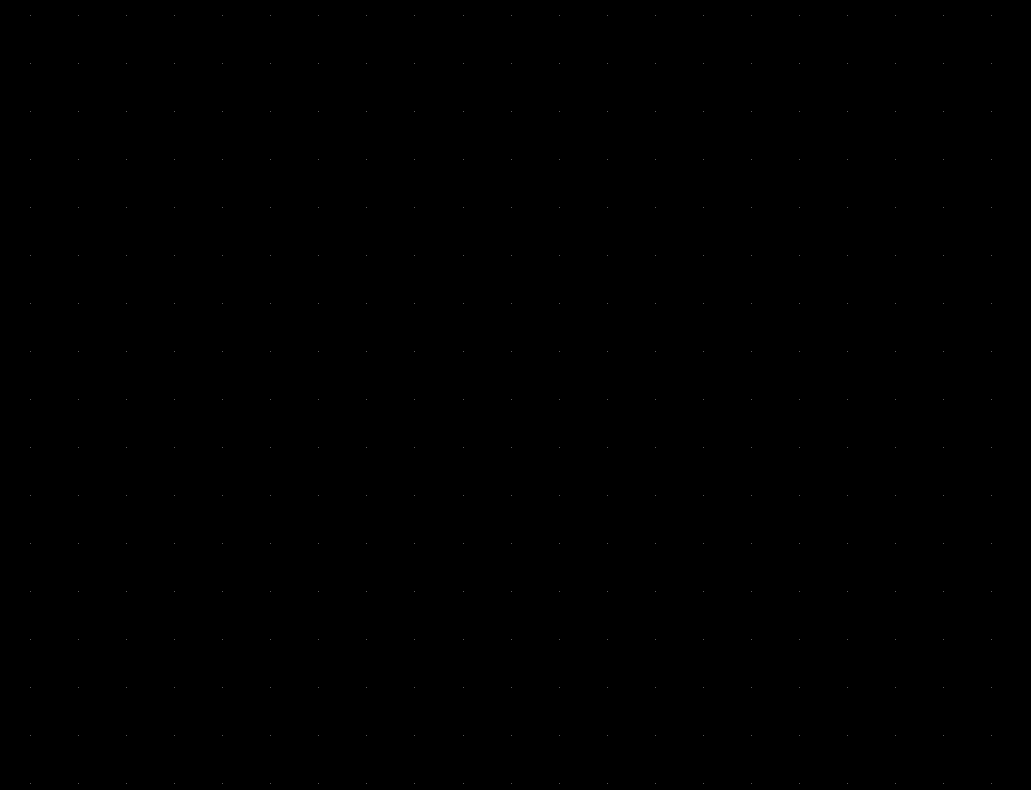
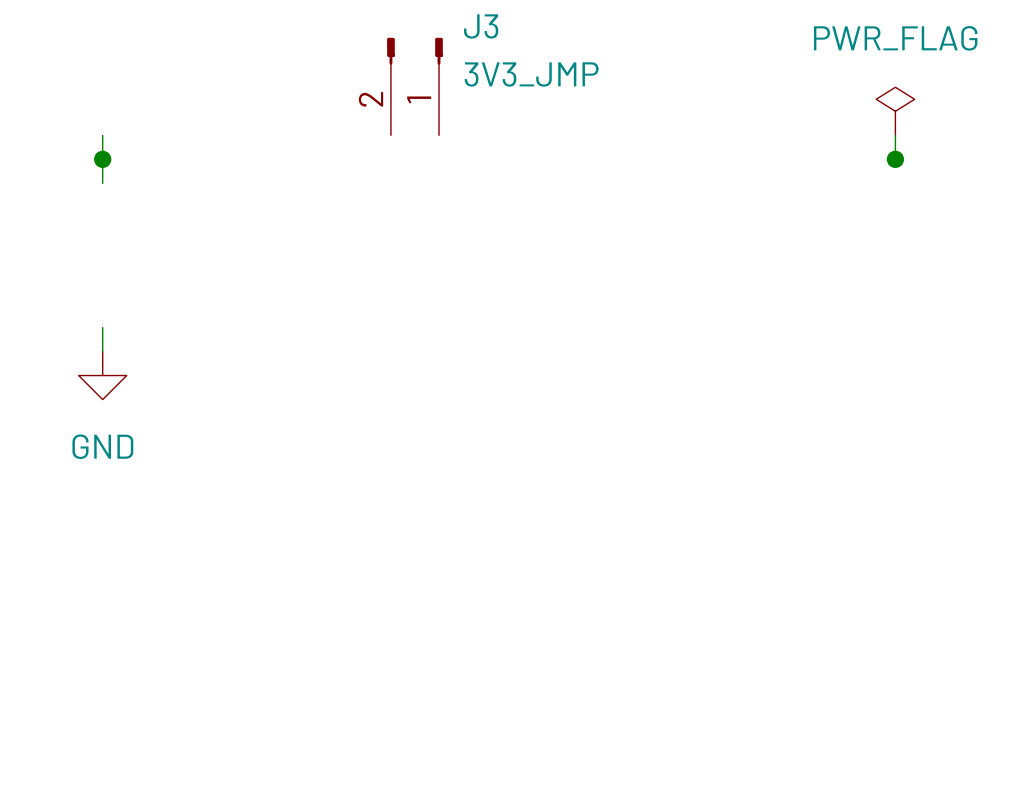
J3: none -> 3V3_JMP (414, 86)
power symbol: none -> PWR_FLAG (895, 111)
wire: none -> (102, 135) (102, 183)
wire: none -> (895, 135) (895, 159)
junction: none -> (102, 159)
junction: none -> (895, 159)
wire: none -> (102, 327) (102, 351)
power symbol: none -> GND (102, 375)

